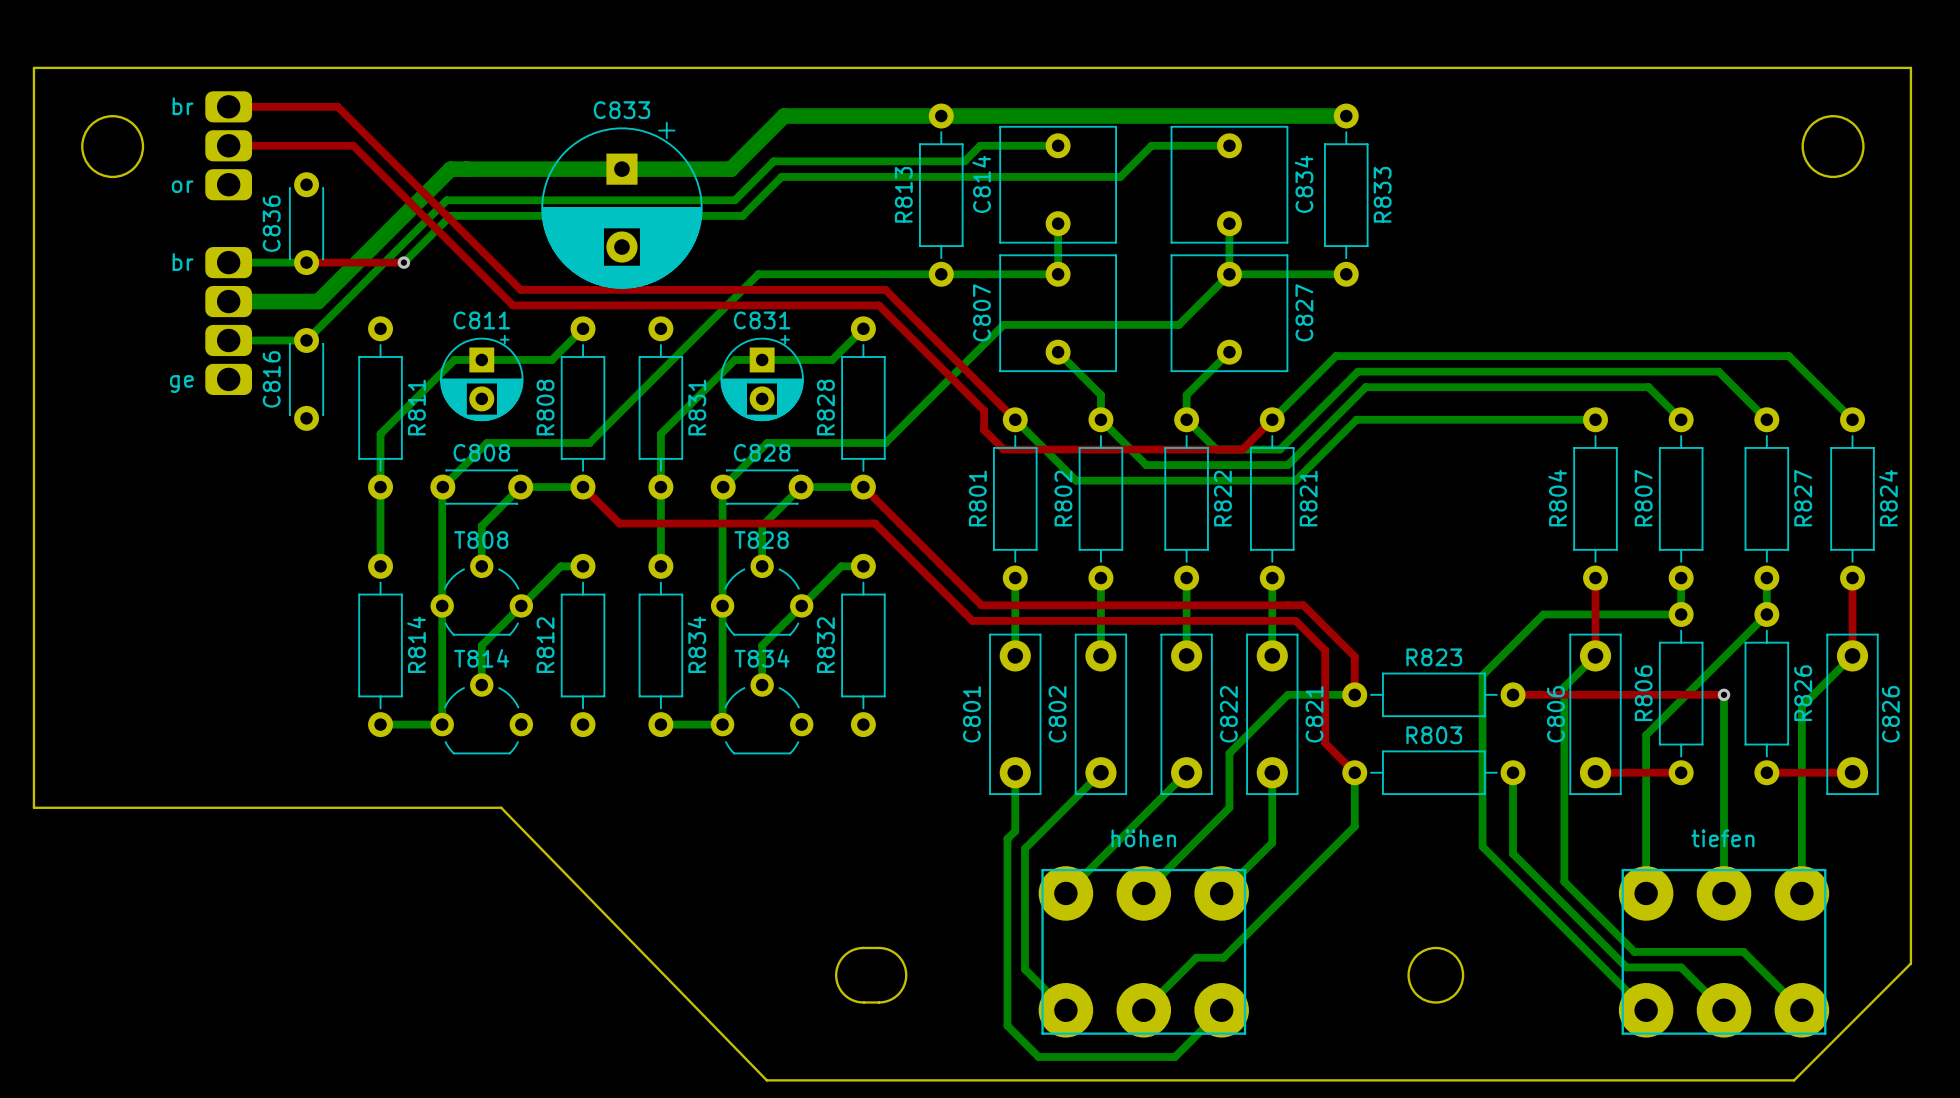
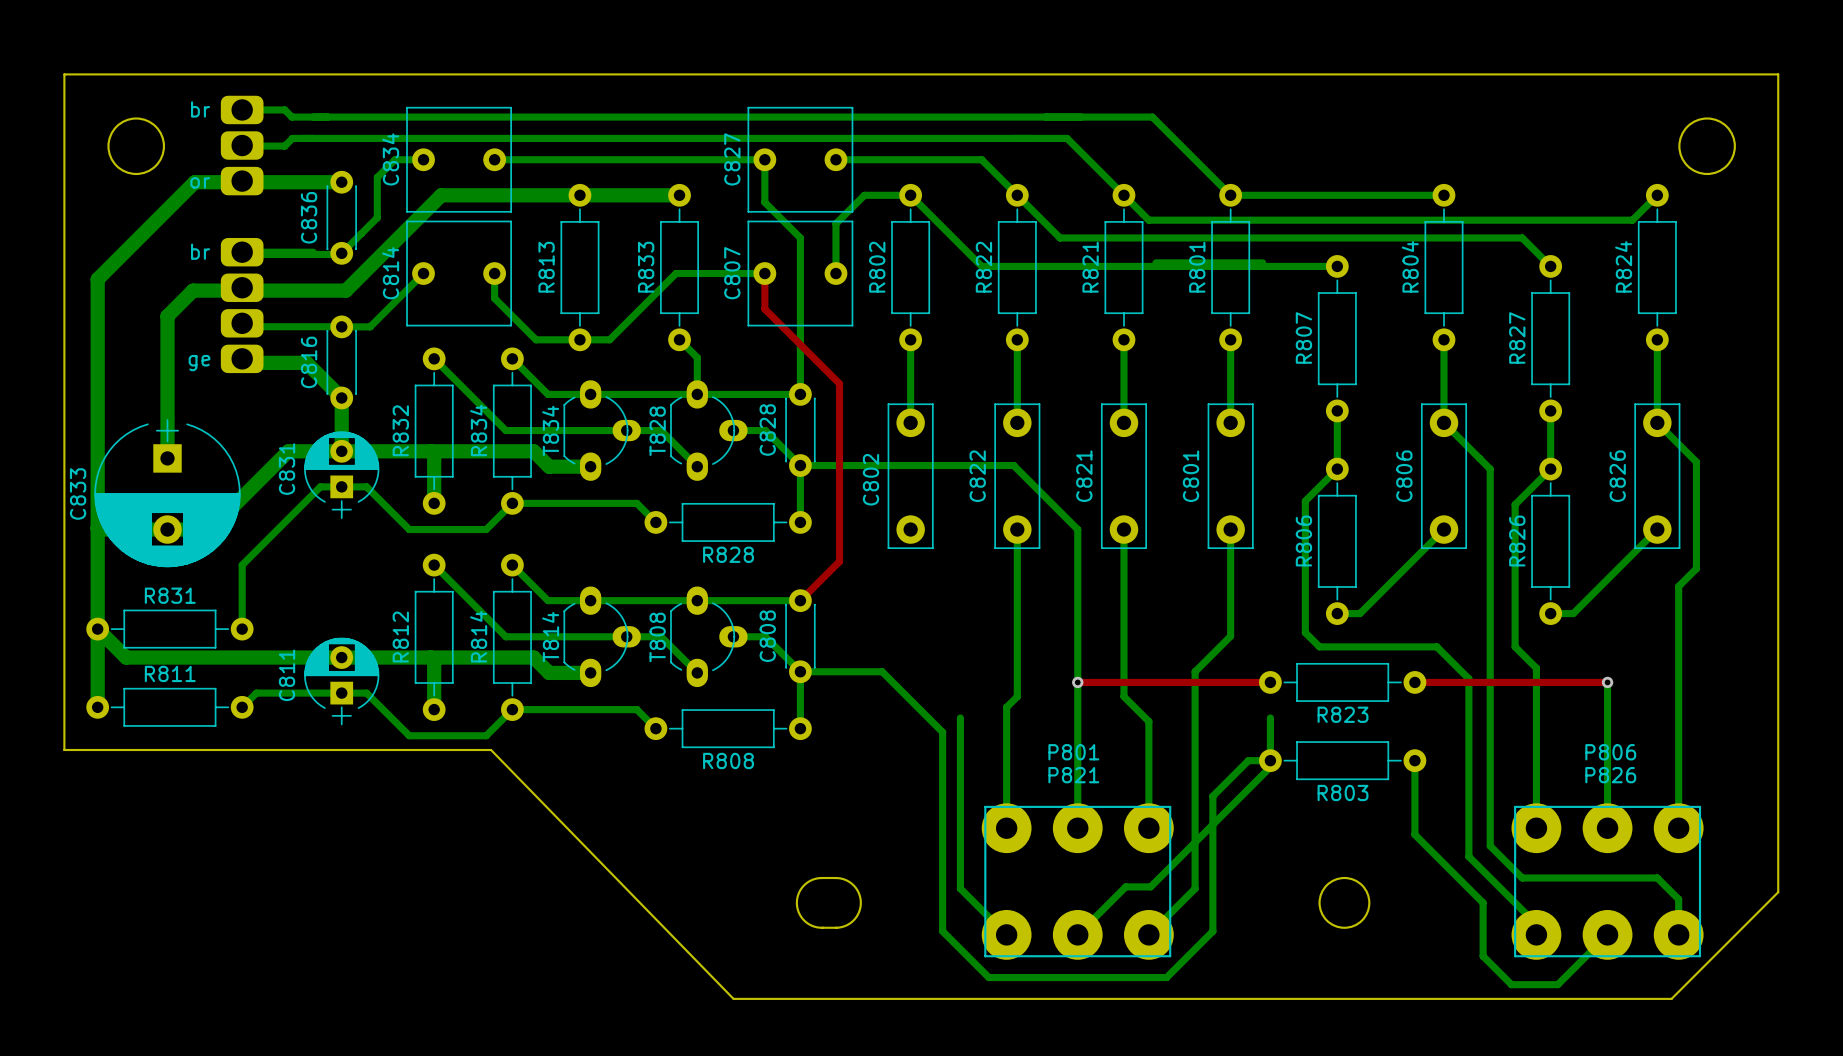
R813 footprint: [919, 103, 964, 287] -> [560, 183, 600, 352]
R833 footprint: [1324, 103, 1369, 287] -> [660, 183, 700, 352]
bottom track: none -> (242, 109) (284, 109) (291, 117) (1152, 117) (1230, 195) (1444, 195)
top track: (228, 106) (337, 106) (520, 289) (885, 289) (1015, 419) -> none
C833 name position: C833 (621, 110) -> C833 (78, 493)
bottom track: (1346, 116) (784, 116) (731, 169) (450, 169) (318, 301) (228, 301) -> none
C833 footprint: [541, 121, 703, 289] -> [94, 419, 241, 568]
C814 footprint: [999, 125, 1117, 244] -> [406, 220, 512, 327]
C834 footprint: [1170, 125, 1289, 244] -> [406, 106, 512, 213]
top track: (228, 145) (353, 145) (512, 305) (878, 305) (984, 410) (984, 430) (1003, 449) (1242, 449) (1272, 419) -> none
bottom track: (1058, 145) (980, 145) (964, 161) -> (1550, 266) (1522, 237) (1059, 237) (981, 159) (914, 159)
bottom track: (1229, 145) (1151, 145) (1120, 176) (781, 176) (742, 215) (450, 215) (403, 262) -> none
bottom track: none -> (242, 146) (284, 146) (292, 138) (1067, 138) (1148, 220) (1632, 220) (1657, 195)
bottom track: none -> (423, 159) (395, 159) (377, 177) (377, 217) (340, 254) (242, 254)
bottom track: (773, 161) (734, 200) (707, 200) -> (739, 159) (494, 159)
bottom track: (801, 161) (878, 161) -> (764, 159) (764, 202) (800, 237) (800, 394) (547, 394) (512, 358)
C836 footprint: [288, 172, 325, 276] -> [326, 170, 357, 265]
C834 name position: C834 (1304, 184) -> C834 (390, 159)
bottom track: none -> (341, 182) (194, 182) (97, 279) (97, 707)
R833 name position: R833 (1382, 194) -> R833 (646, 267)
bottom track width: thin (707, 200) (446, 200) (342, 304) -> thick (679, 195) (441, 195) (346, 290)
bottom track: (1058, 223) (1058, 274) (758, 274) (589, 442) (486, 442) (442, 487) (442, 724) (380, 724) -> none
bottom track: (1229, 223) (1229, 274) (1178, 324) (1003, 324) (885, 442) (767, 442) (722, 487) (722, 724) (660, 724) -> none
C807 footprint: [999, 254, 1117, 373] -> [747, 220, 854, 327]
C827 footprint: [1170, 254, 1289, 373] -> [747, 106, 854, 213]
top track: (306, 262) (403, 262) -> none
via: (403, 262) -> none
bottom track: none -> (1337, 266) (981, 266) (910, 195) (864, 195) (835, 223) (835, 273)
bottom track: none -> (423, 273) (370, 326) (341, 326)
bottom track: none -> (494, 273) (494, 298) (536, 339) (609, 339) (675, 273) (764, 273)
top track: none -> (764, 273) (764, 309) (839, 383) (839, 561) (800, 600)
bottom track: (342, 304) (306, 340) (228, 340) -> (346, 290) (193, 290) (167, 316) (167, 458)
C827 name position: C827 (1304, 312) -> C827 (732, 159)
R811 footprint: [358, 316, 403, 500] -> [86, 687, 254, 727]
R808 footprint: [560, 316, 606, 500] -> [644, 709, 812, 749]
R831 footprint: [638, 316, 684, 500] -> [86, 609, 254, 649]
R828 footprint: [841, 316, 886, 500] -> [644, 502, 812, 542]
C811 name position: C811 (481, 320) -> C811 (287, 675)
C831 name position: C831 (762, 320) -> C831 (287, 469)
C816 footprint: [288, 328, 325, 431] -> [326, 315, 357, 410]
bottom track: (583, 328) (551, 359) (454, 359) (380, 433) (380, 566) -> none
bottom track: (863, 328) (832, 359) (734, 359) (660, 433) (660, 566) -> none
C811 footprint: [440, 334, 524, 422] -> [304, 637, 380, 726]
C831 footprint: [720, 334, 804, 422] -> [304, 431, 380, 520]
bottom track: none -> (242, 326) (341, 326)
bottom track: (1058, 352) (1100, 395) (1100, 419) (1146, 465) (1287, 465) (1365, 387) (1648, 387) (1681, 419) -> none
bottom track: (1229, 352) (1186, 395) (1186, 419) (1216, 449) (1280, 449) (1357, 371) (1718, 371) (1766, 419) -> none
bottom track: none -> (679, 339) (697, 357) (697, 394)
bottom track: none -> (910, 339) (910, 422)
bottom track: none -> (1017, 339) (1017, 422)
bottom track: none -> (1123, 339) (1123, 422)
bottom track: none -> (1230, 339) (1230, 422)
bottom track: none -> (434, 358) (505, 430) (661, 430) (697, 466)
bottom track: none -> (242, 362) (306, 362) (341, 397) (341, 451)
R811 name position: R811 (416, 407) -> R811 (170, 673)
R808 name position: R808 (545, 407) -> R808 (728, 760)
R831 name position: R831 (697, 407) -> R831 (170, 595)
R828 name position: R828 (825, 407) -> R828 (728, 554)
R801 footprint: [993, 407, 1038, 591] -> [1211, 183, 1251, 352]
R802 footprint: [1078, 407, 1124, 591] -> [891, 183, 931, 352]
R822 footprint: [1164, 407, 1209, 591] -> [997, 183, 1037, 352]
R821 footprint: [1250, 407, 1295, 591] -> [1104, 183, 1144, 352]
R804 footprint: [1573, 407, 1618, 591] -> [1424, 183, 1464, 352]
R807 footprint: [1658, 407, 1704, 591] -> [1317, 255, 1357, 423]
R827 footprint: [1744, 407, 1790, 591] -> [1531, 255, 1571, 423]
R824 footprint: [1830, 407, 1875, 591] -> [1637, 183, 1677, 352]
bottom track: (1015, 419) (1076, 480) (1295, 480) (1356, 419) (1595, 419) -> none
bottom track: (1272, 419) (1336, 356) (1788, 356) (1852, 419) -> none
bottom track: none -> (1337, 410) (1337, 469) (1305, 501) (1305, 632) (1319, 646) (1436, 646) (1468, 678) (1468, 856) (1536, 924)
C808 name position: C808 (481, 452) -> C808 (767, 636)
C828 name position: C828 (762, 452) -> C828 (767, 429)
bottom track: none -> (733, 430) (765, 430) (800, 465)
C808 footprint: [430, 469, 534, 505] -> [785, 589, 816, 684]
C828 footprint: [710, 469, 814, 505] -> [785, 383, 816, 477]
bottom track: none -> (430, 451) (434, 454) (434, 503)
bottom track: (583, 487) (520, 487) (481, 526) (481, 566) -> none
top track: (583, 487) (619, 523) (875, 523) (972, 620) (1295, 620) (1325, 650) (1325, 743) (1354, 772) -> none
bottom track: (863, 487) (801, 487) (762, 526) (762, 566) -> none
top track: (863, 487) (981, 605) (1303, 605) (1354, 656) (1354, 694) -> none
bottom track: none -> (800, 465) (800, 522)
bottom track: none -> (590, 466) (549, 466) (533, 451) (288, 451) (210, 529) (97, 528)
R822 name position: R822 (1222, 498) -> R822 (983, 267)
R821 name position: R821 (1308, 498) -> R821 (1090, 267)
R827 name position: R827 (1803, 498) -> R827 (1517, 337)
R824 name position: R824 (1888, 498) -> R824 (1623, 266)
T808 name position: T808 (481, 540) -> T808 (657, 637)
T828 name position: T828 (761, 540) -> T828 (657, 431)
R814 footprint: [358, 553, 403, 738] -> [492, 553, 532, 721]
R812 footprint: [560, 553, 606, 738] -> [414, 553, 454, 721]
R834 footprint: [638, 553, 684, 738] -> [492, 347, 532, 515]
R832 footprint: [841, 553, 886, 738] -> [414, 347, 454, 515]
T808 footprint: [430, 554, 534, 636] -> [670, 586, 748, 688]
T828 footprint: [710, 554, 814, 636] -> [670, 380, 748, 481]
bottom track: none -> (655, 522) (636, 503) (512, 503) (486, 529) (409, 529) (366, 486) (320, 486) (242, 565) (242, 629)
bottom track: (583, 566) (560, 566) (481, 645) (481, 685) -> none
bottom track: (863, 566) (841, 566) (762, 645) (762, 685) -> none
bottom track: none -> (1123, 529) (1123, 696) (1148, 721) (1148, 828)
bottom track: none -> (1230, 529) (1230, 636) (1195, 671) (1195, 717)
bottom track: none -> (1444, 529) (1359, 613) (1337, 613)
bottom track: none -> (1657, 529) (1573, 613) (1550, 613)
bottom track: (1015, 578) (1015, 655) -> none
bottom track: (1100, 578) (1100, 655) -> none
bottom track: (1186, 578) (1186, 655) -> none
bottom track: (1272, 578) (1272, 655) -> none
top track: (1595, 578) (1595, 655) -> none
bottom track: (1681, 578) (1681, 614) (1543, 614) (1482, 675) (1482, 846) (1646, 1010) -> none
bottom track: (1766, 578) (1766, 614) (1646, 735) -> (1550, 410) (1550, 469) (1515, 504) (1515, 646) (1536, 668) (1536, 683)
top track: (1852, 578) (1852, 655) -> none
R806 footprint: [1658, 602, 1704, 786] -> [1317, 457, 1357, 625]
R826 footprint: [1744, 602, 1790, 786] -> [1531, 457, 1571, 625]
bottom track: none -> (434, 565) (505, 636) (661, 636) (697, 672)
bottom track: none -> (512, 565) (547, 600) (800, 600)
C801 footprint: [989, 633, 1042, 796] -> [1207, 403, 1254, 550]
C802 footprint: [1074, 633, 1128, 796] -> [887, 403, 934, 550]
C822 footprint: [1160, 633, 1213, 796] -> [994, 403, 1041, 550]
C821 footprint: [1246, 633, 1299, 796] -> [1100, 403, 1148, 550]
C806 footprint: [1569, 633, 1622, 796] -> [1420, 403, 1468, 550]
C826 footprint: [1826, 633, 1879, 796] -> [1634, 403, 1681, 550]
R814 name position: R814 (416, 644) -> R814 (478, 636)
R834 name position: R834 (696, 644) -> R834 (478, 430)
bottom track: (1595, 655) (1564, 687) (1564, 881) (1595, 912) -> (1444, 339) (1444, 422) (1490, 469) (1490, 846)
bottom track: (1852, 655) (1801, 706) -> (1657, 339) (1657, 422) (1696, 461) (1696, 568) (1678, 586) (1678, 657)
R823 name position: R823 (1434, 657) -> R823 (1343, 714)
T814 name position: T814 (481, 658) -> T814 (550, 637)
T834 name position: T834 (761, 658) -> T834 (550, 430)
R823 footprint: [1342, 672, 1526, 718] -> [1259, 662, 1427, 702]
T814 footprint: [430, 673, 534, 755] -> [563, 586, 641, 688]
T834 footprint: [710, 673, 814, 755] -> [563, 380, 641, 481]
bottom track: none -> (97, 629) (126, 657) (533, 657) (549, 672) (590, 672)
bottom track: none -> (733, 636) (765, 636) (800, 671)
R826 name position: R826 (1803, 693) -> R826 (1517, 541)
bottom track: (1354, 694) (1287, 694) (1229, 753) (1229, 807) (1143, 893) -> (800, 465) (1013, 465) (1077, 529) (1077, 828)
top track: (1513, 694) (1724, 694) -> (1414, 682) (1607, 682)
bottom track: (1724, 694) (1724, 733) -> none
via position: (1724, 694) -> (1607, 682)
bottom track: none -> (430, 657) (434, 661) (434, 709)
C822 name position: C822 (1228, 714) -> C822 (977, 476)
C821 name position: C821 (1314, 714) -> C821 (1084, 476)
C826 name position: C826 (1890, 714) -> C826 (1617, 476)
bottom track: none -> (800, 671) (800, 728)
bottom track: none -> (800, 671) (882, 671) (942, 732) (942, 931) (988, 977)
top track: none -> (1077, 682) (1270, 682)
via: none -> (1077, 682)
R803 name position: R803 (1434, 735) -> R803 (1343, 792)
R803 footprint: [1342, 750, 1526, 796] -> [1259, 741, 1427, 781]
bottom track: none -> (242, 707) (256, 693) (366, 693) (409, 735) (486, 735) (512, 709) (636, 709) (655, 728)
bottom track: (1100, 772) (1025, 848) (1025, 969) -> none
bottom track: (1186, 772) (1065, 893) -> (1017, 529) (1017, 696) (1006, 707) (1006, 828)
bottom track: (1513, 772) (1513, 819) -> none
top track: (1595, 772) (1681, 772) -> none
top track: (1766, 772) (1852, 772) -> none
text: none -> P801 (1073, 752)
text: none -> P806 (1610, 752)
bottom track: (1015, 831) (1007, 838) (1007, 1025) (1038, 1057) (1046, 1057) -> (960, 771) (960, 888) (969, 897)
text: höhen (1143, 838) -> P821 (1073, 775)
text: tiefen (1722, 838) -> P826 (1610, 775)
bottom track: (1272, 842) (1221, 893) -> (1195, 782) (1195, 888) (1148, 934)
bottom track: (1513, 853) (1626, 967) (1681, 967) (1724, 1010) -> (1414, 792) (1414, 834) (1483, 902) (1483, 956) (1511, 984) (1557, 984) (1607, 934)
bottom track: (1630, 947) (1634, 951) (1743, 951) (1801, 1010) -> (1522, 878) (1657, 878) (1678, 899) (1678, 934)
bottom track: (1221, 1010) (1174, 1057) -> (1270, 760) (1248, 760) (1212, 796) (1212, 931) (1166, 977) (1106, 977)

